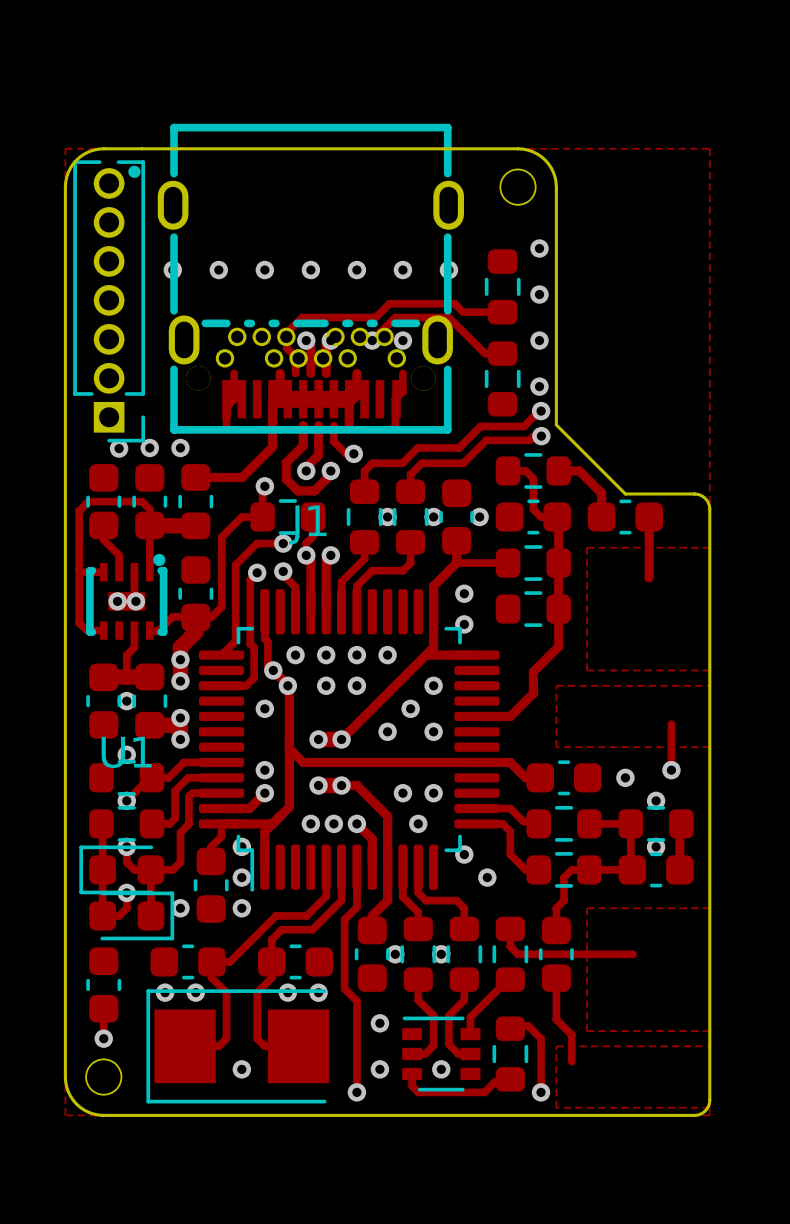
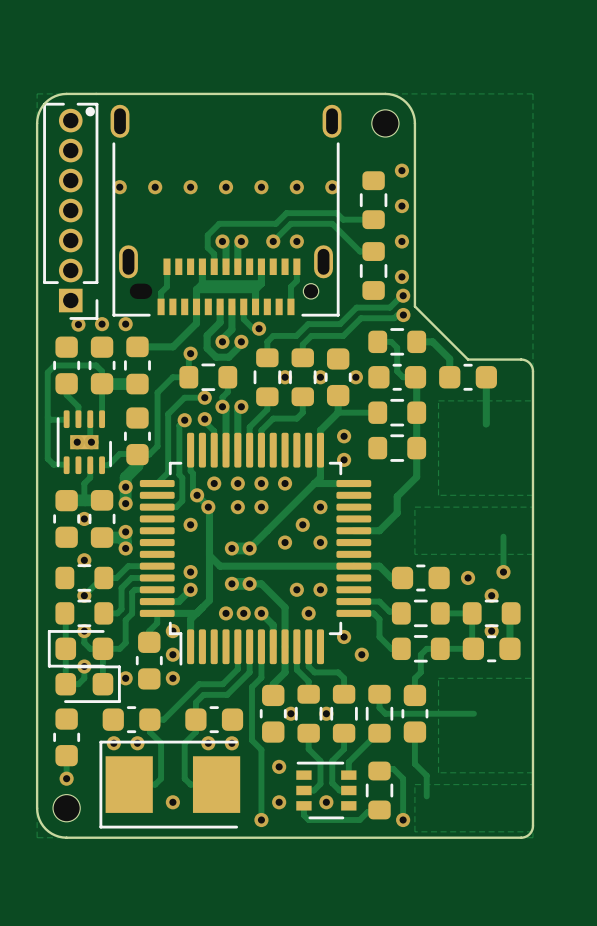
J1: (310, 278) -> none
part: none -> (226, 210)
U1: (126, 596) -> none
part: none -> (84, 442)

